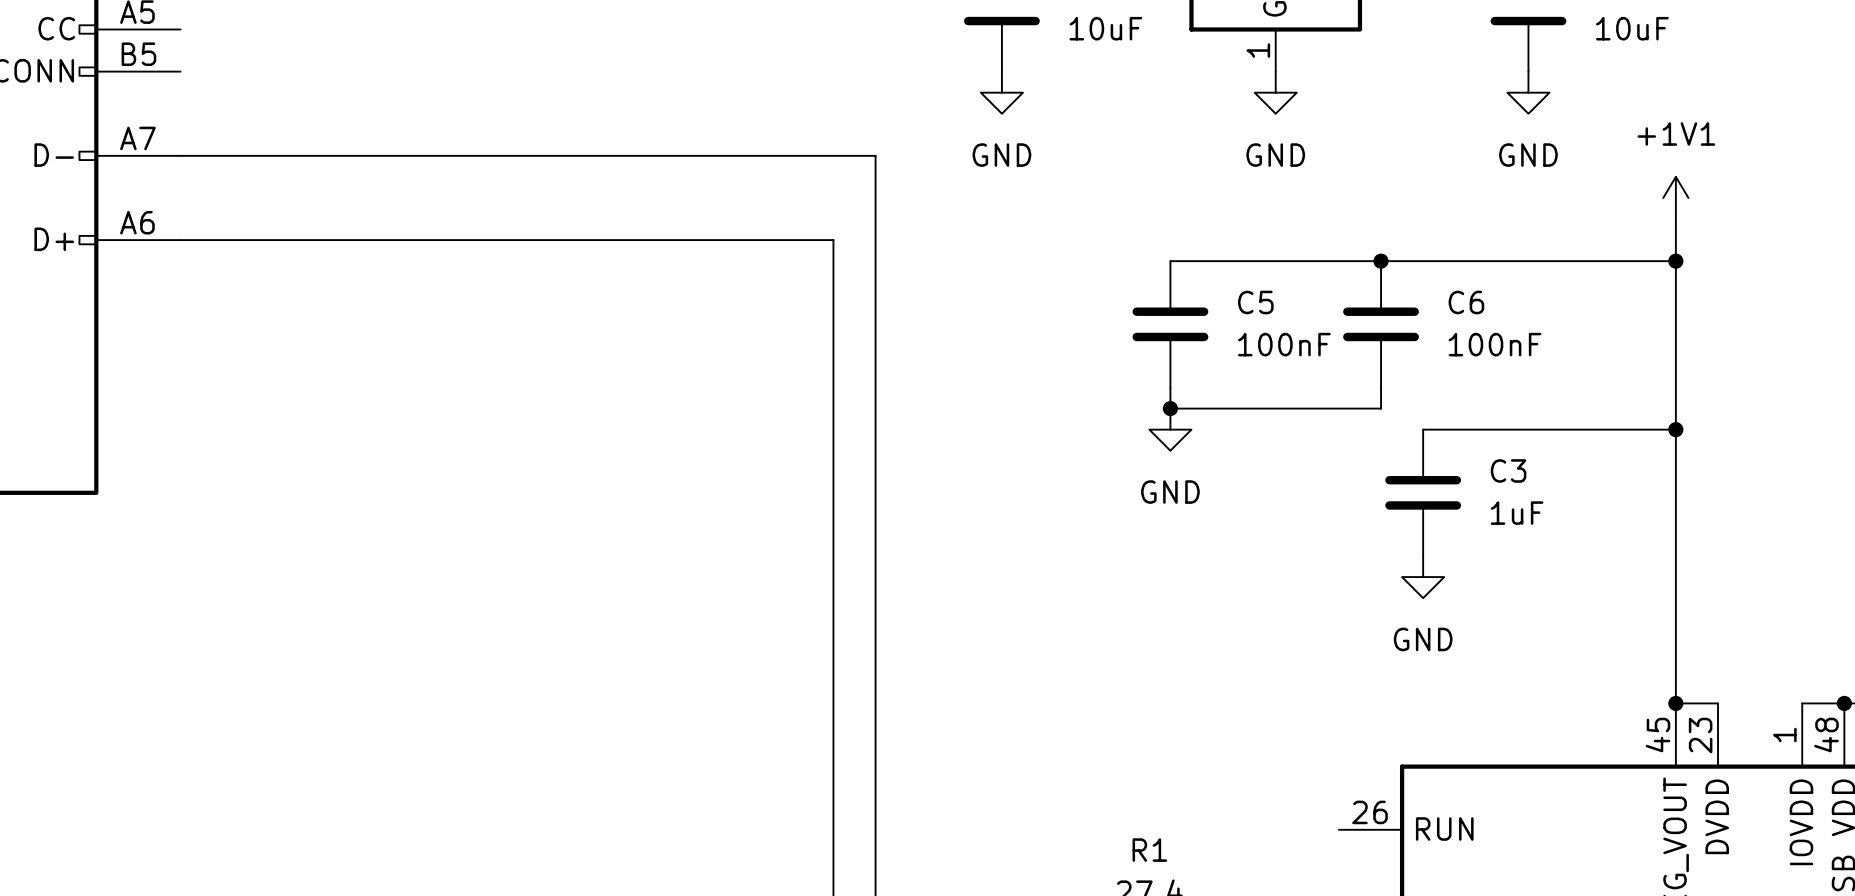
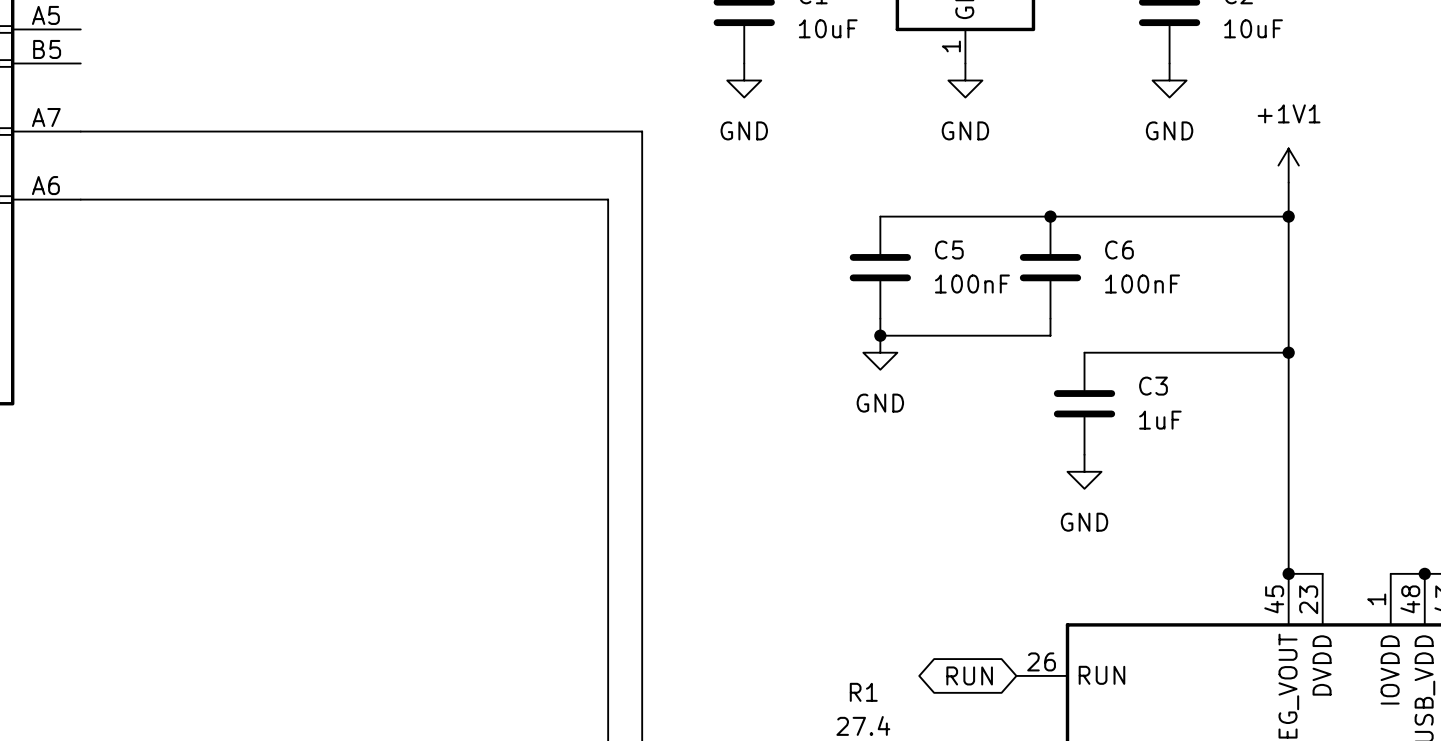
global label: none -> RUN (969, 675)

